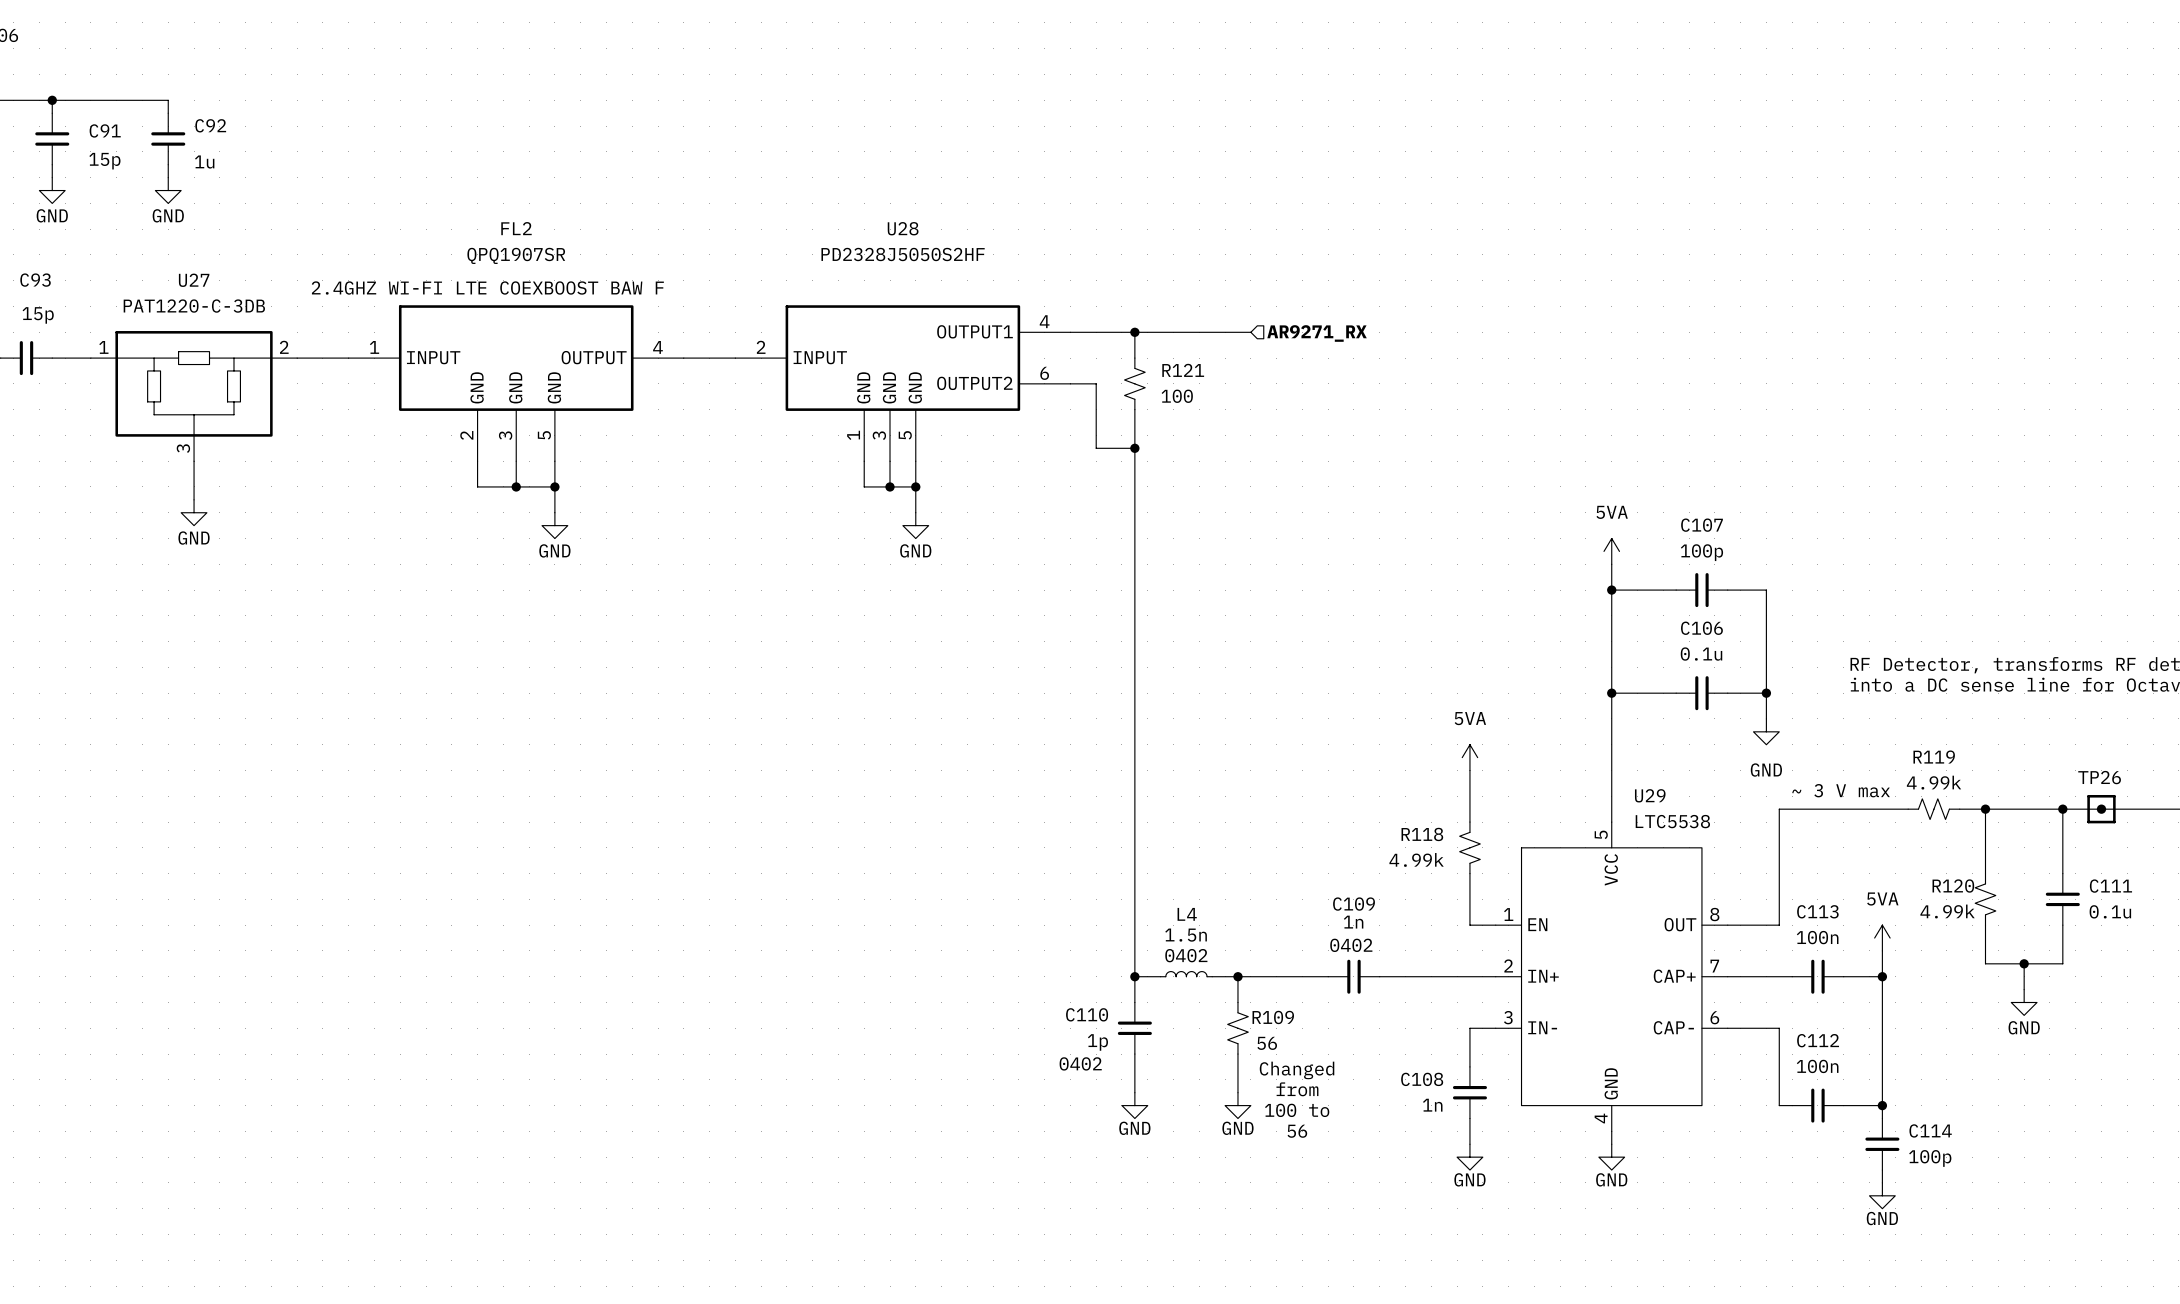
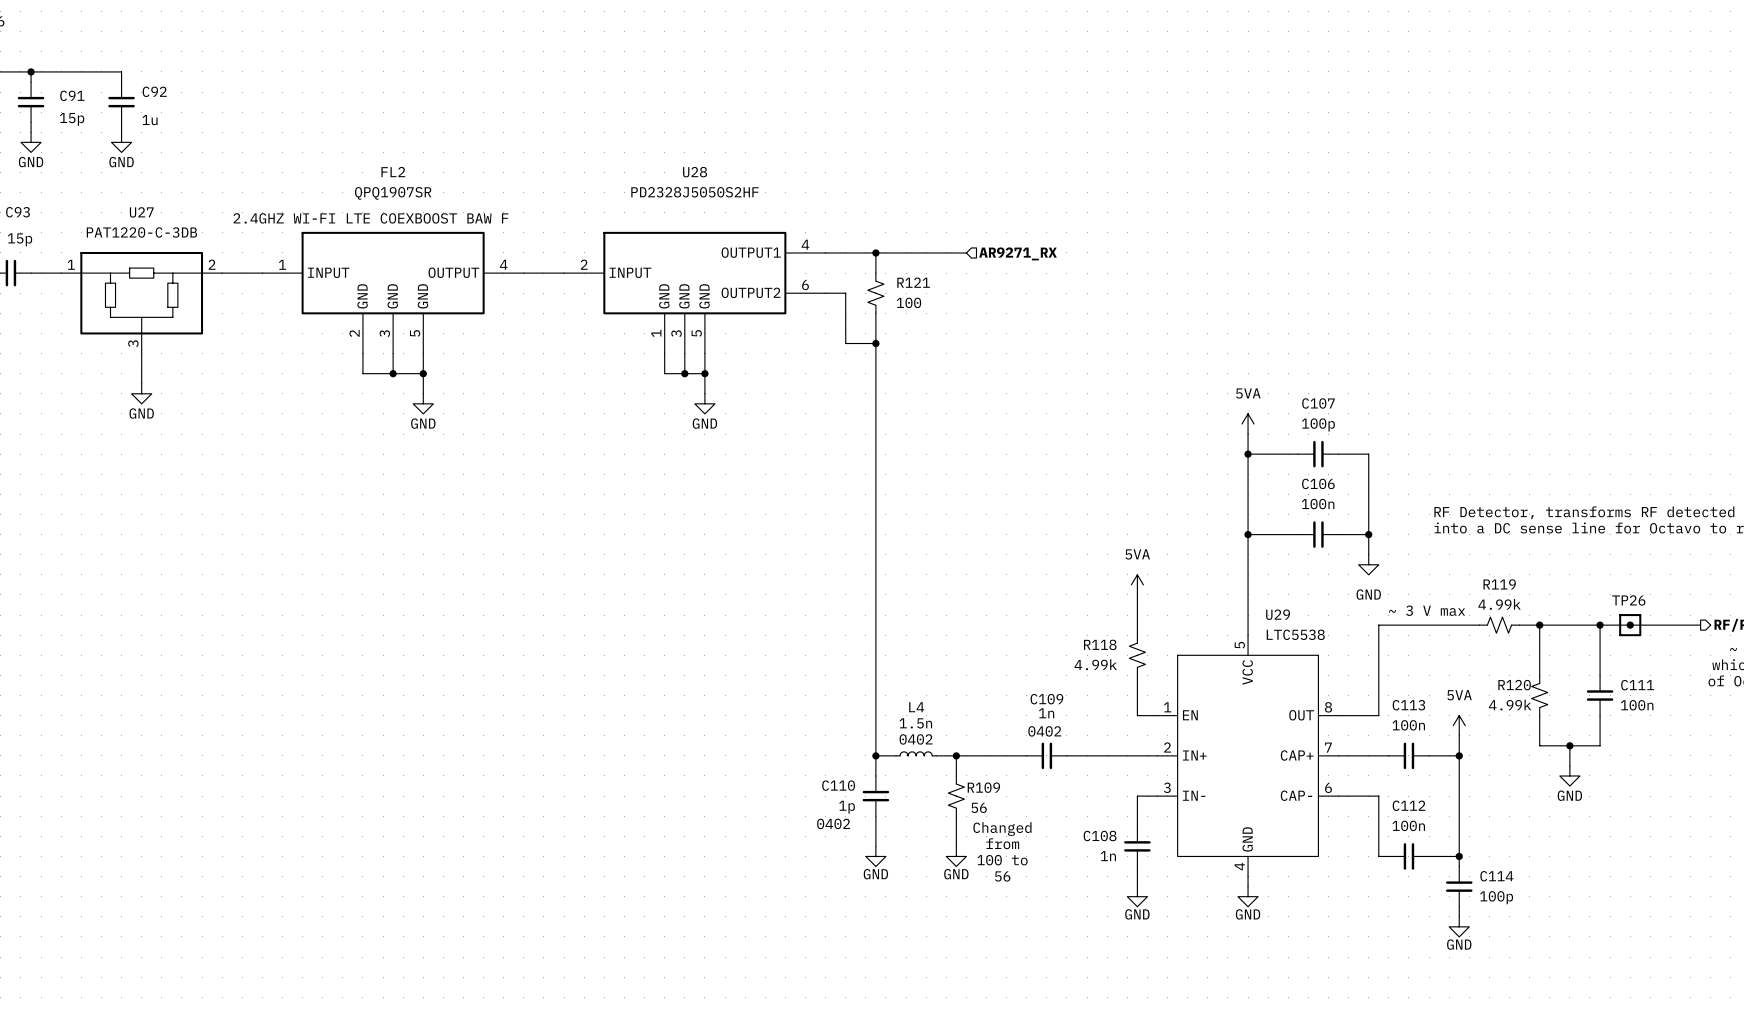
C106 value: 0.1u (1701, 654) -> 100n (1318, 504)
C111 value: 0.1u (2110, 911) -> 100n (1637, 705)

